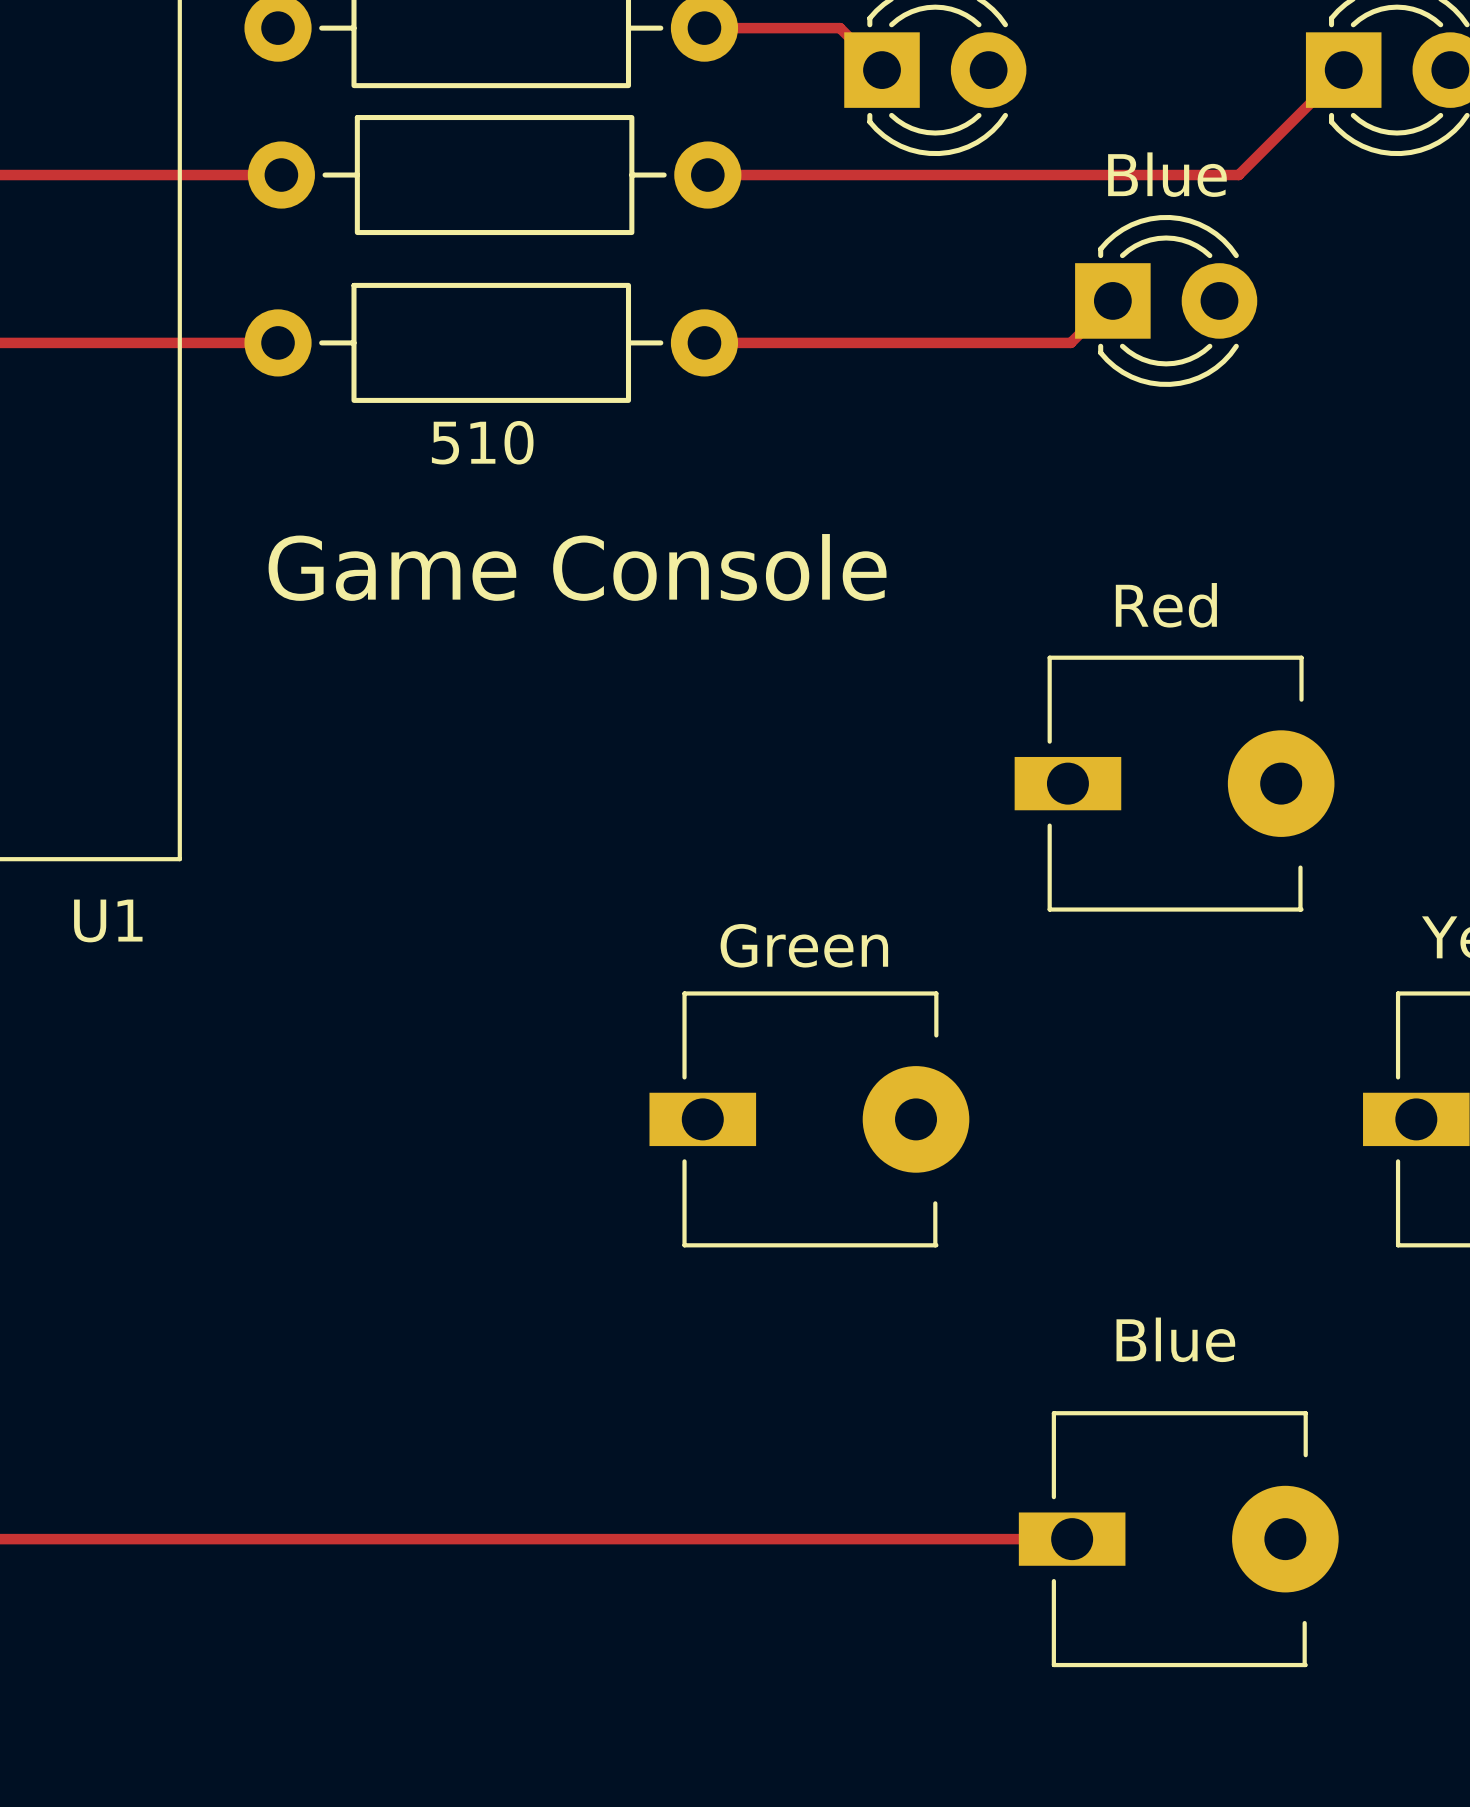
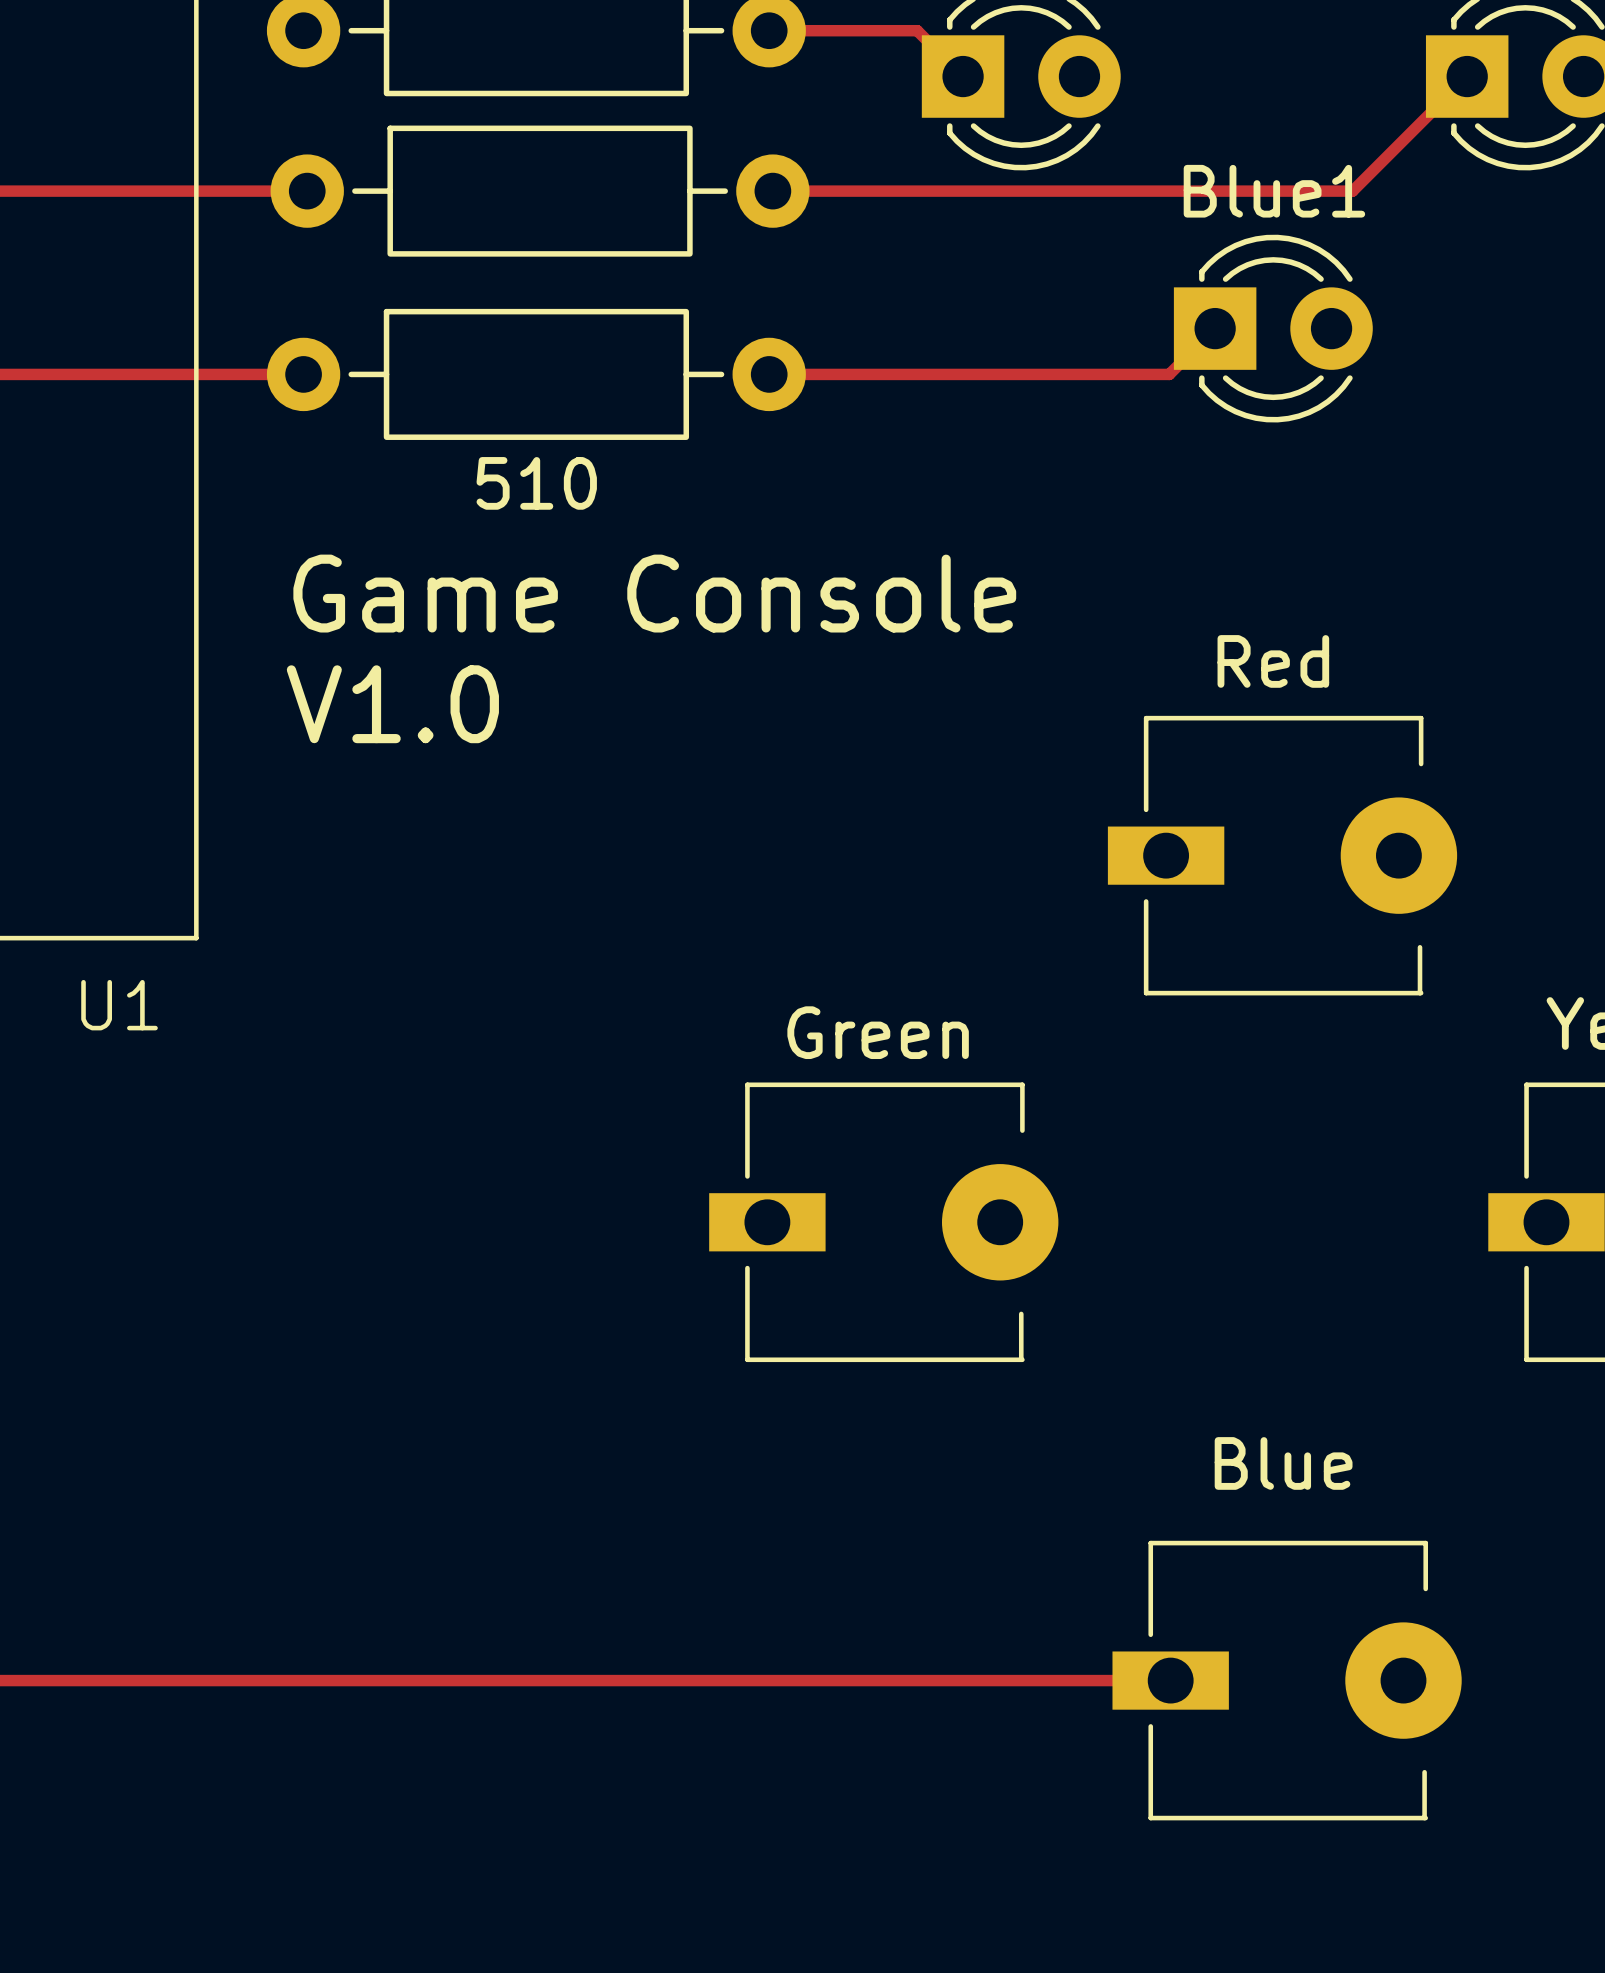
Blue name: Blue (1167, 174) -> Blue1 (1274, 191)
text position: Game Console (577, 567) -> Game Console (654, 593)
text: none -> V1.0 (392, 704)

